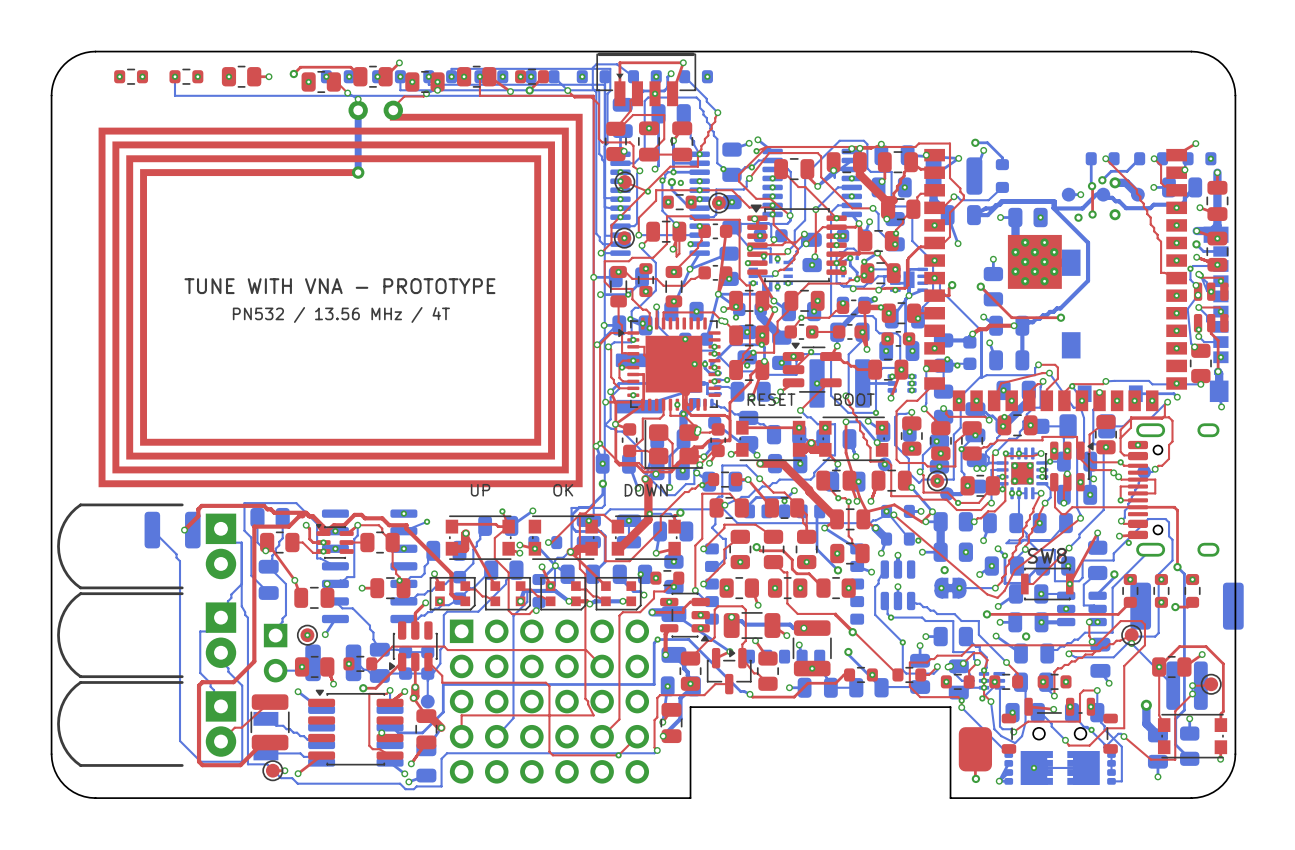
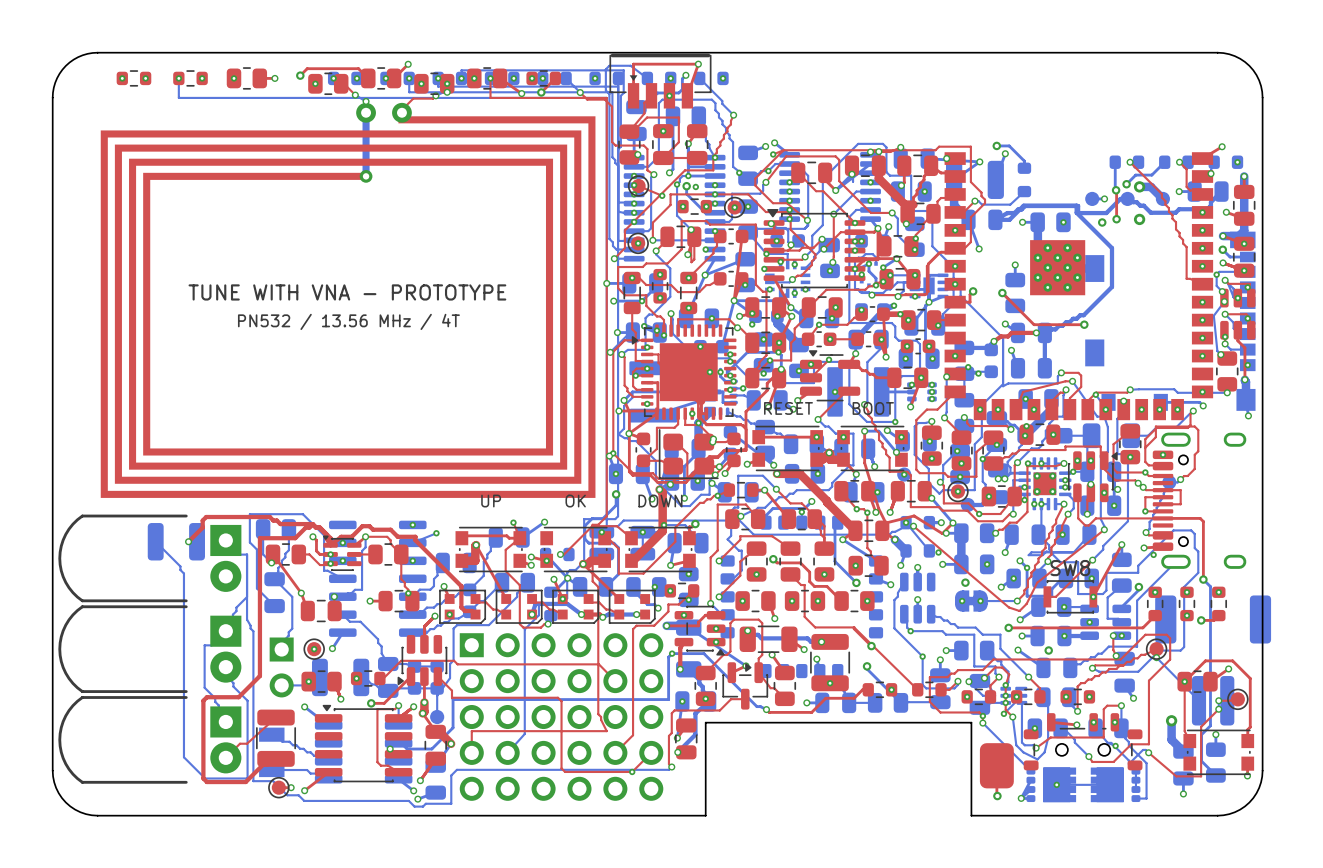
via: (1200, 275) -> none
via: (725, 321) -> none
via: (950, 666) -> none

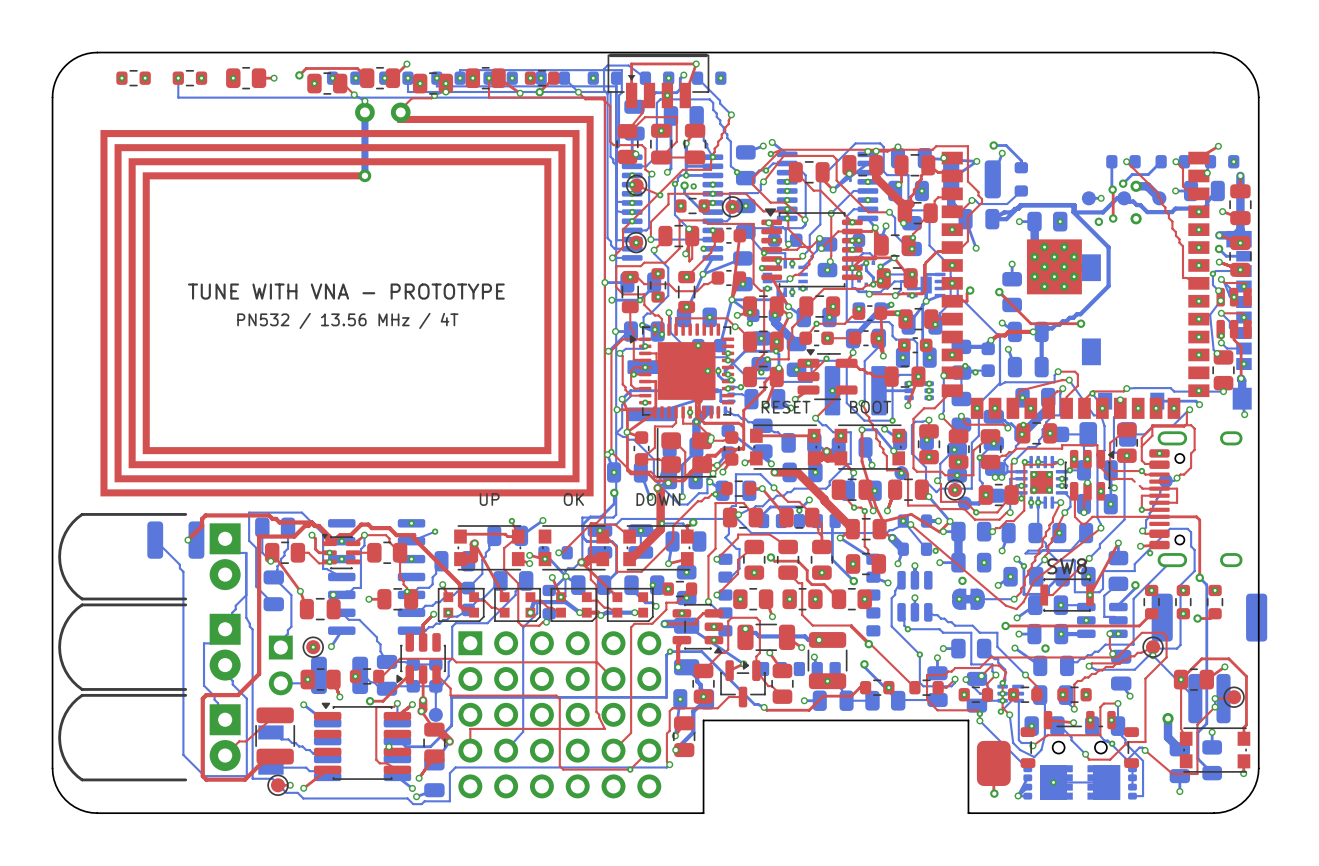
via: (1138, 483) -> none
via: (1143, 487) -> none

